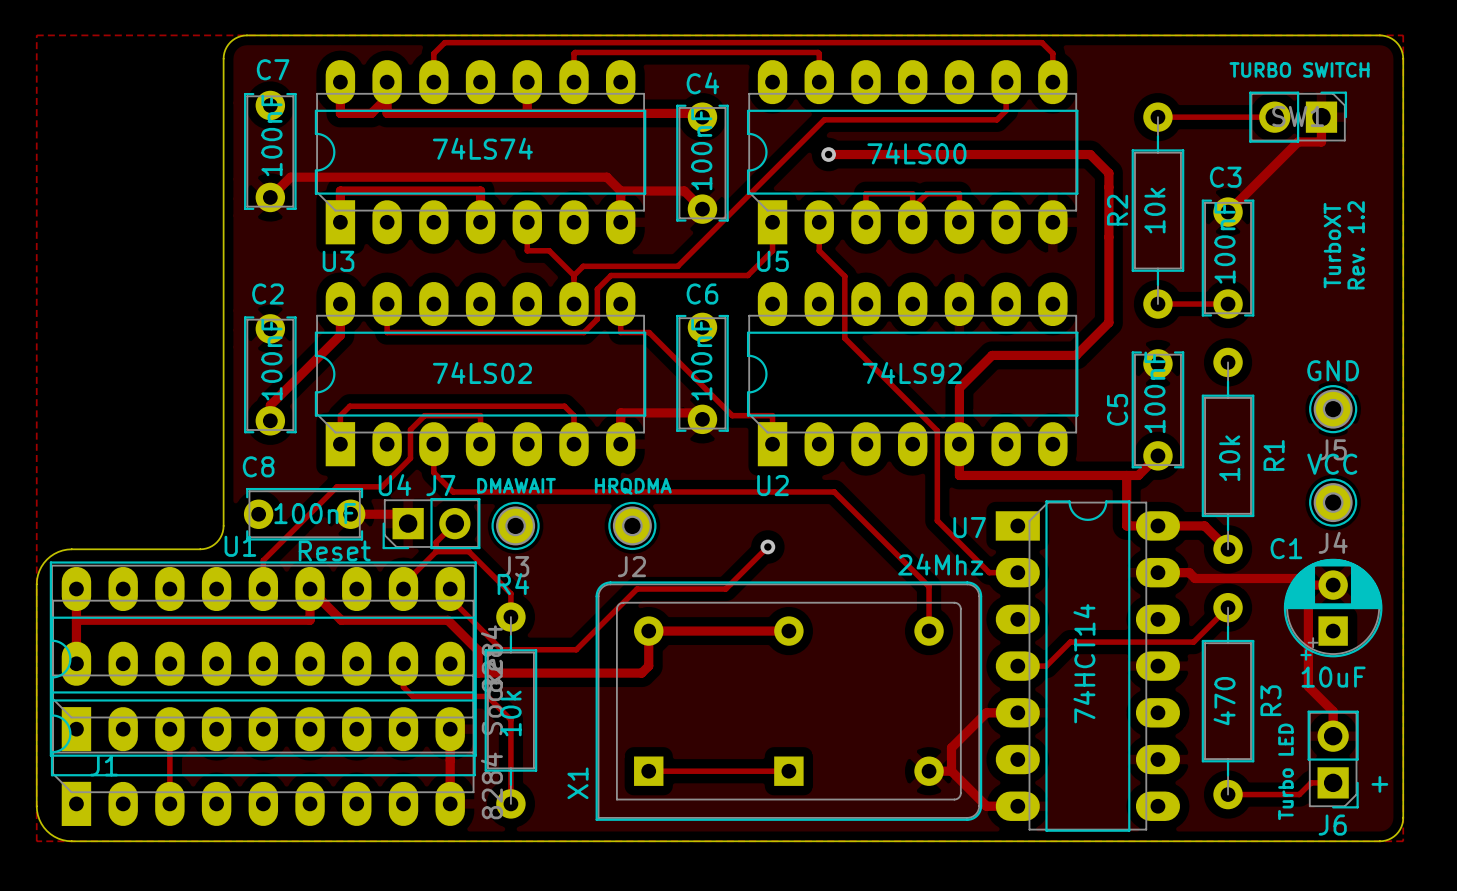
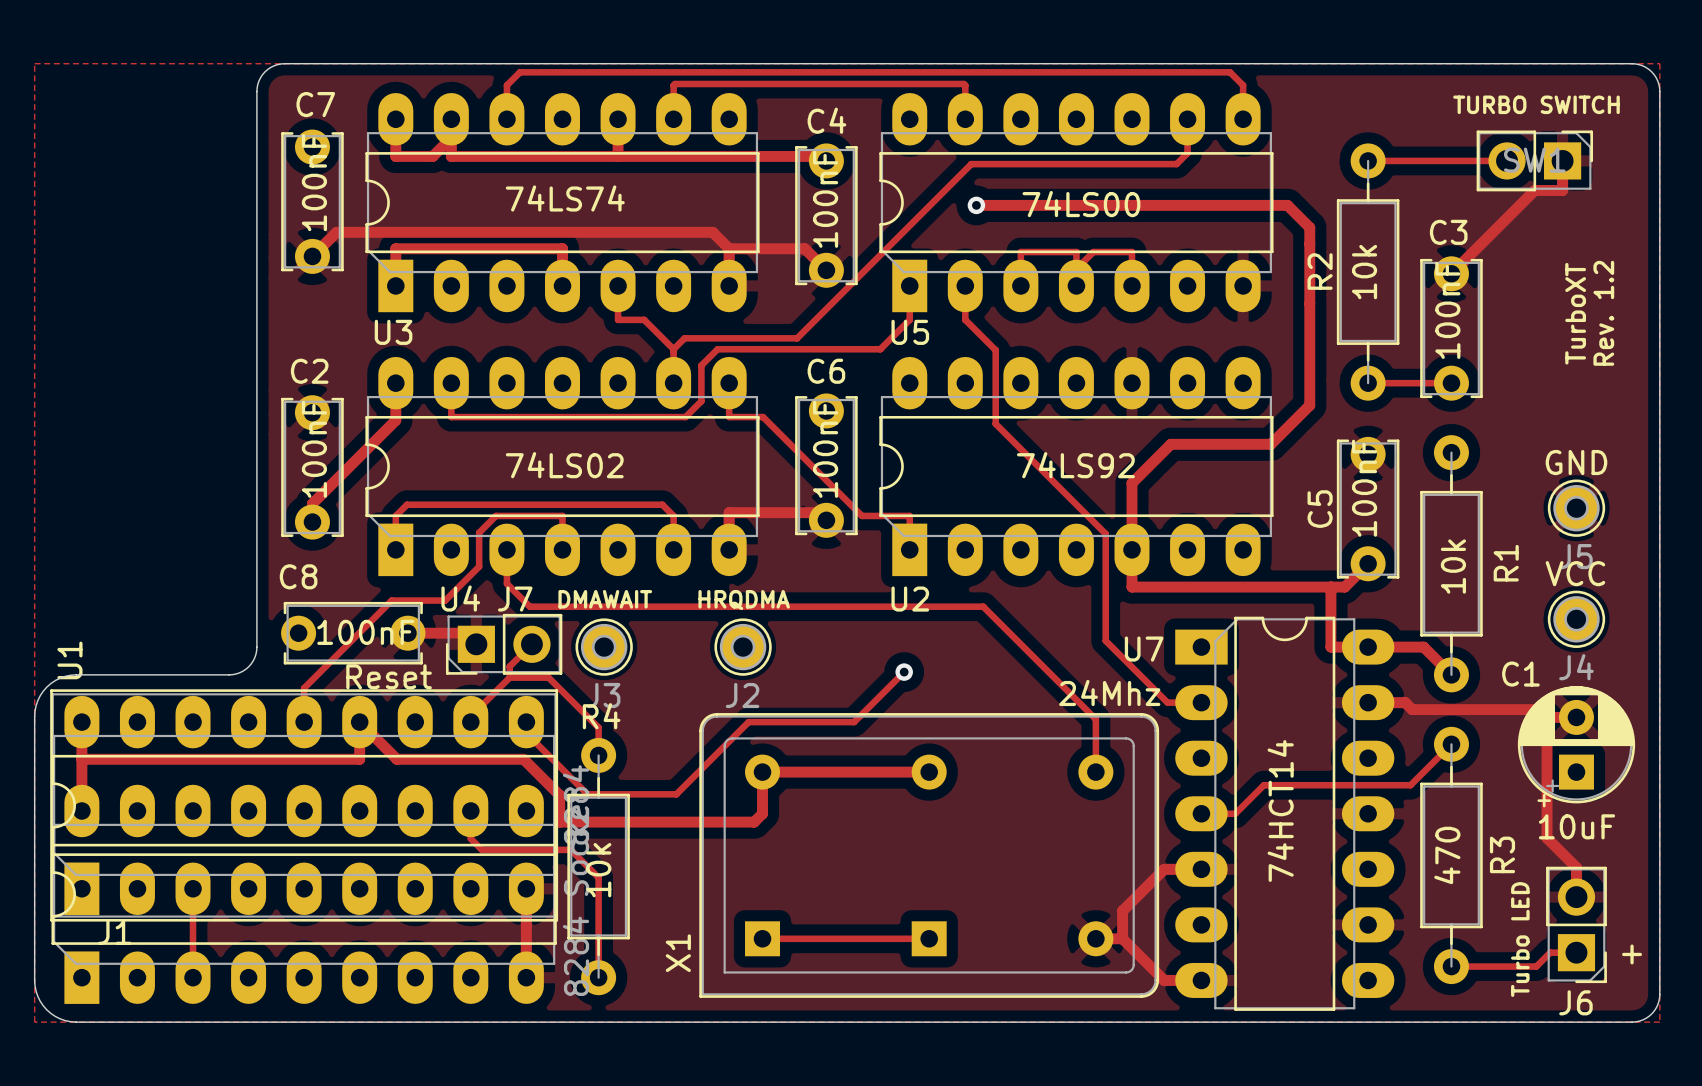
U1 name rotation: 0° (240, 546) -> 90° counterclockwise (69, 660)
U1 name position: U1 (240, 546) -> U1 (69, 660)

